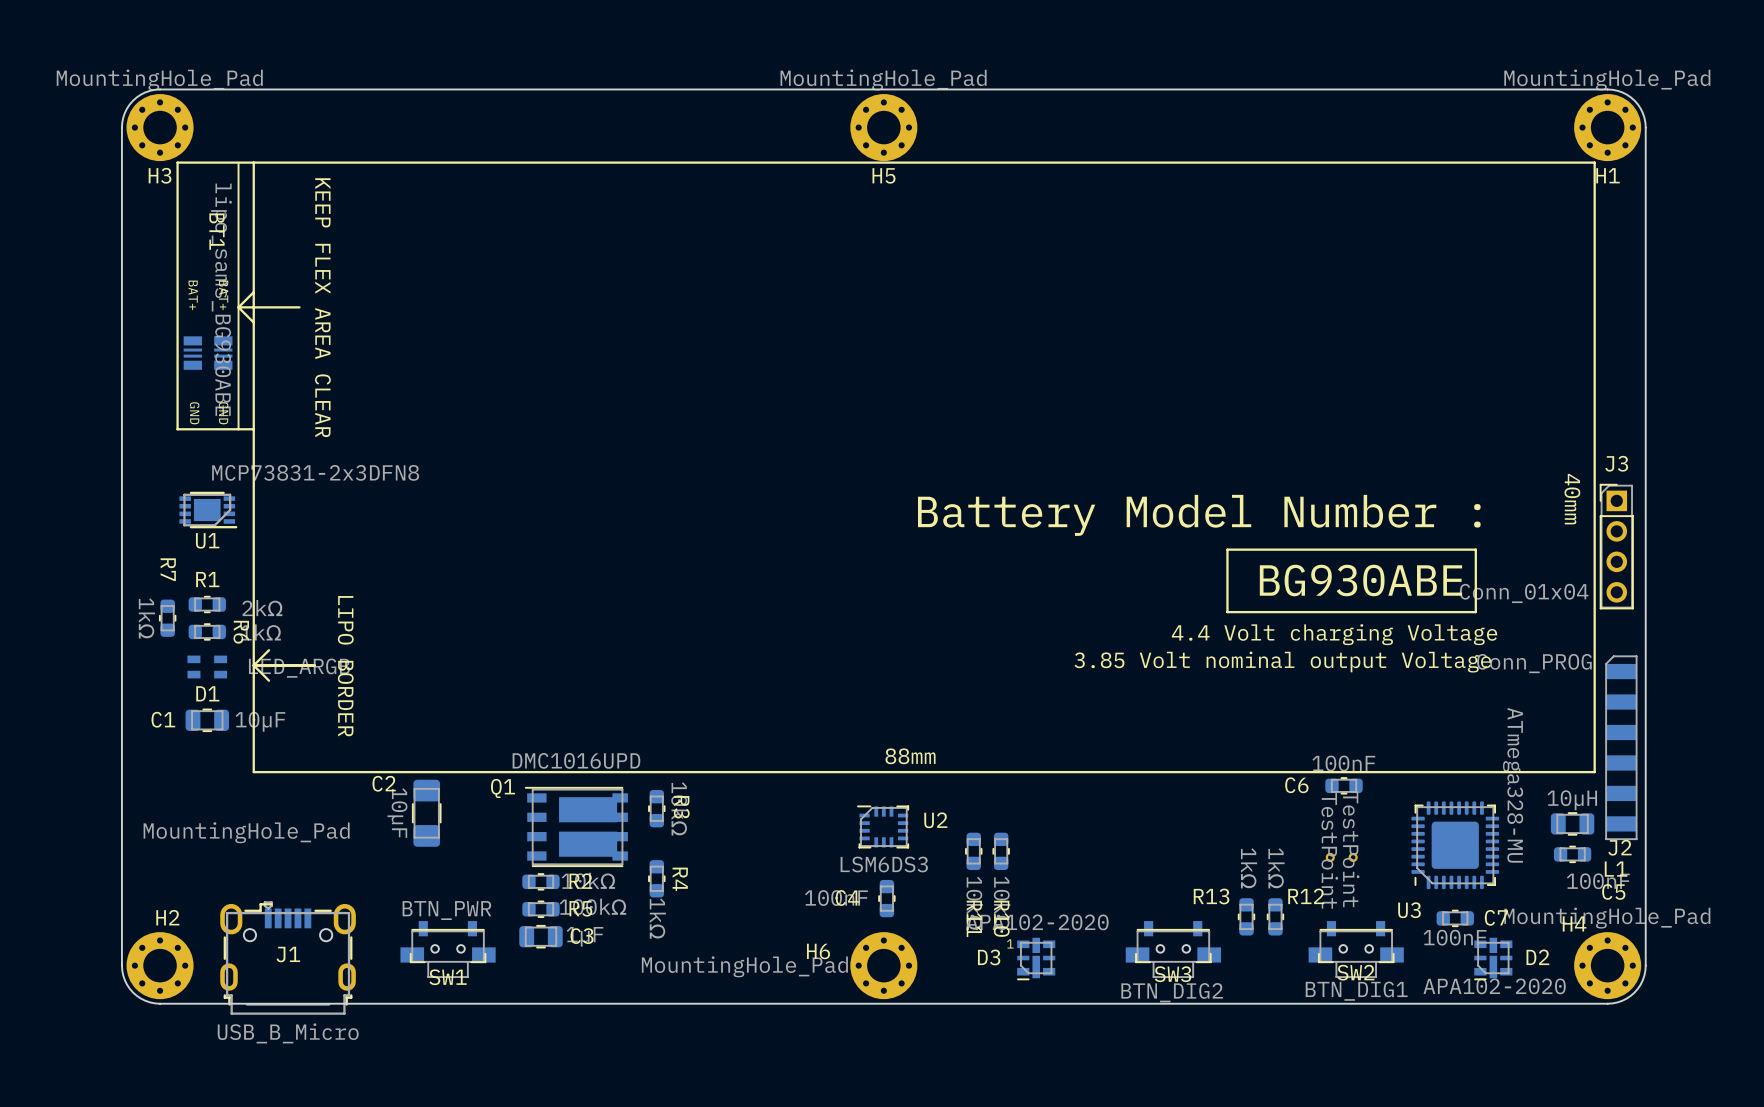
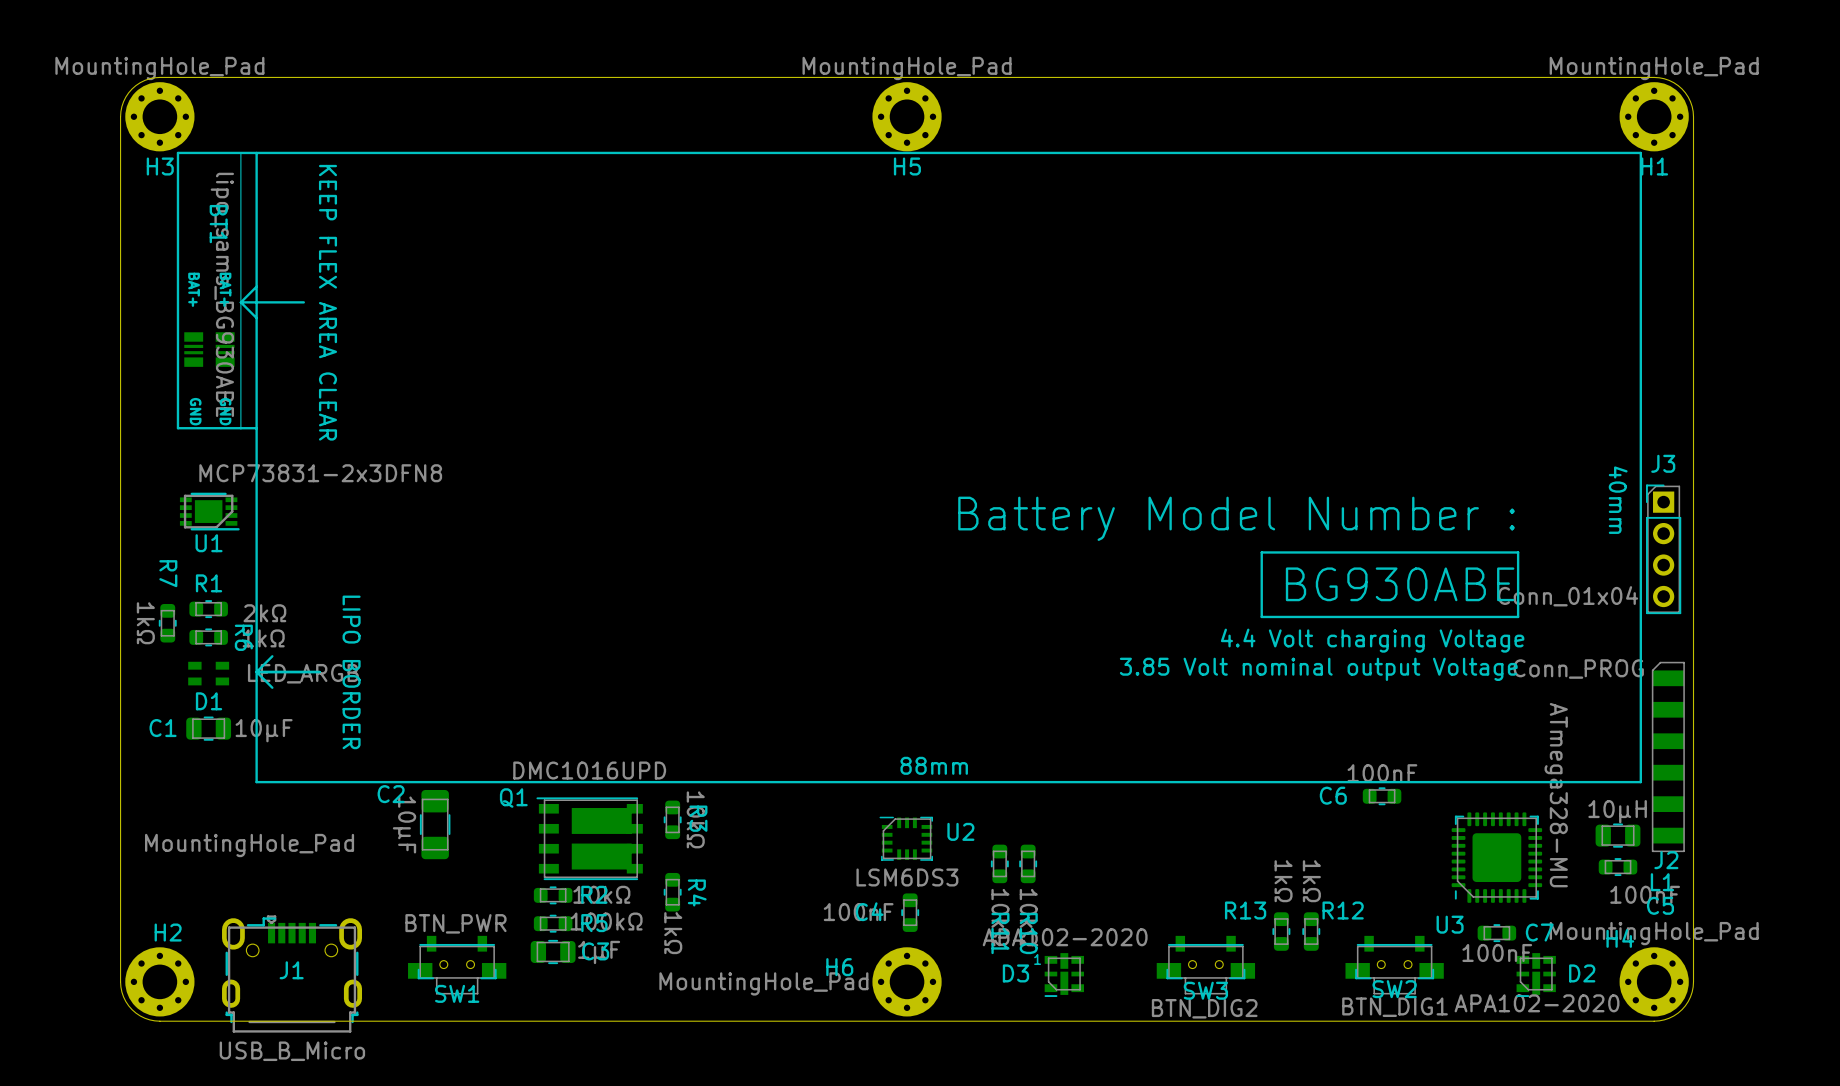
part: TestPoint (1330, 857) -> none
part: TestPoint (1353, 857) -> none

